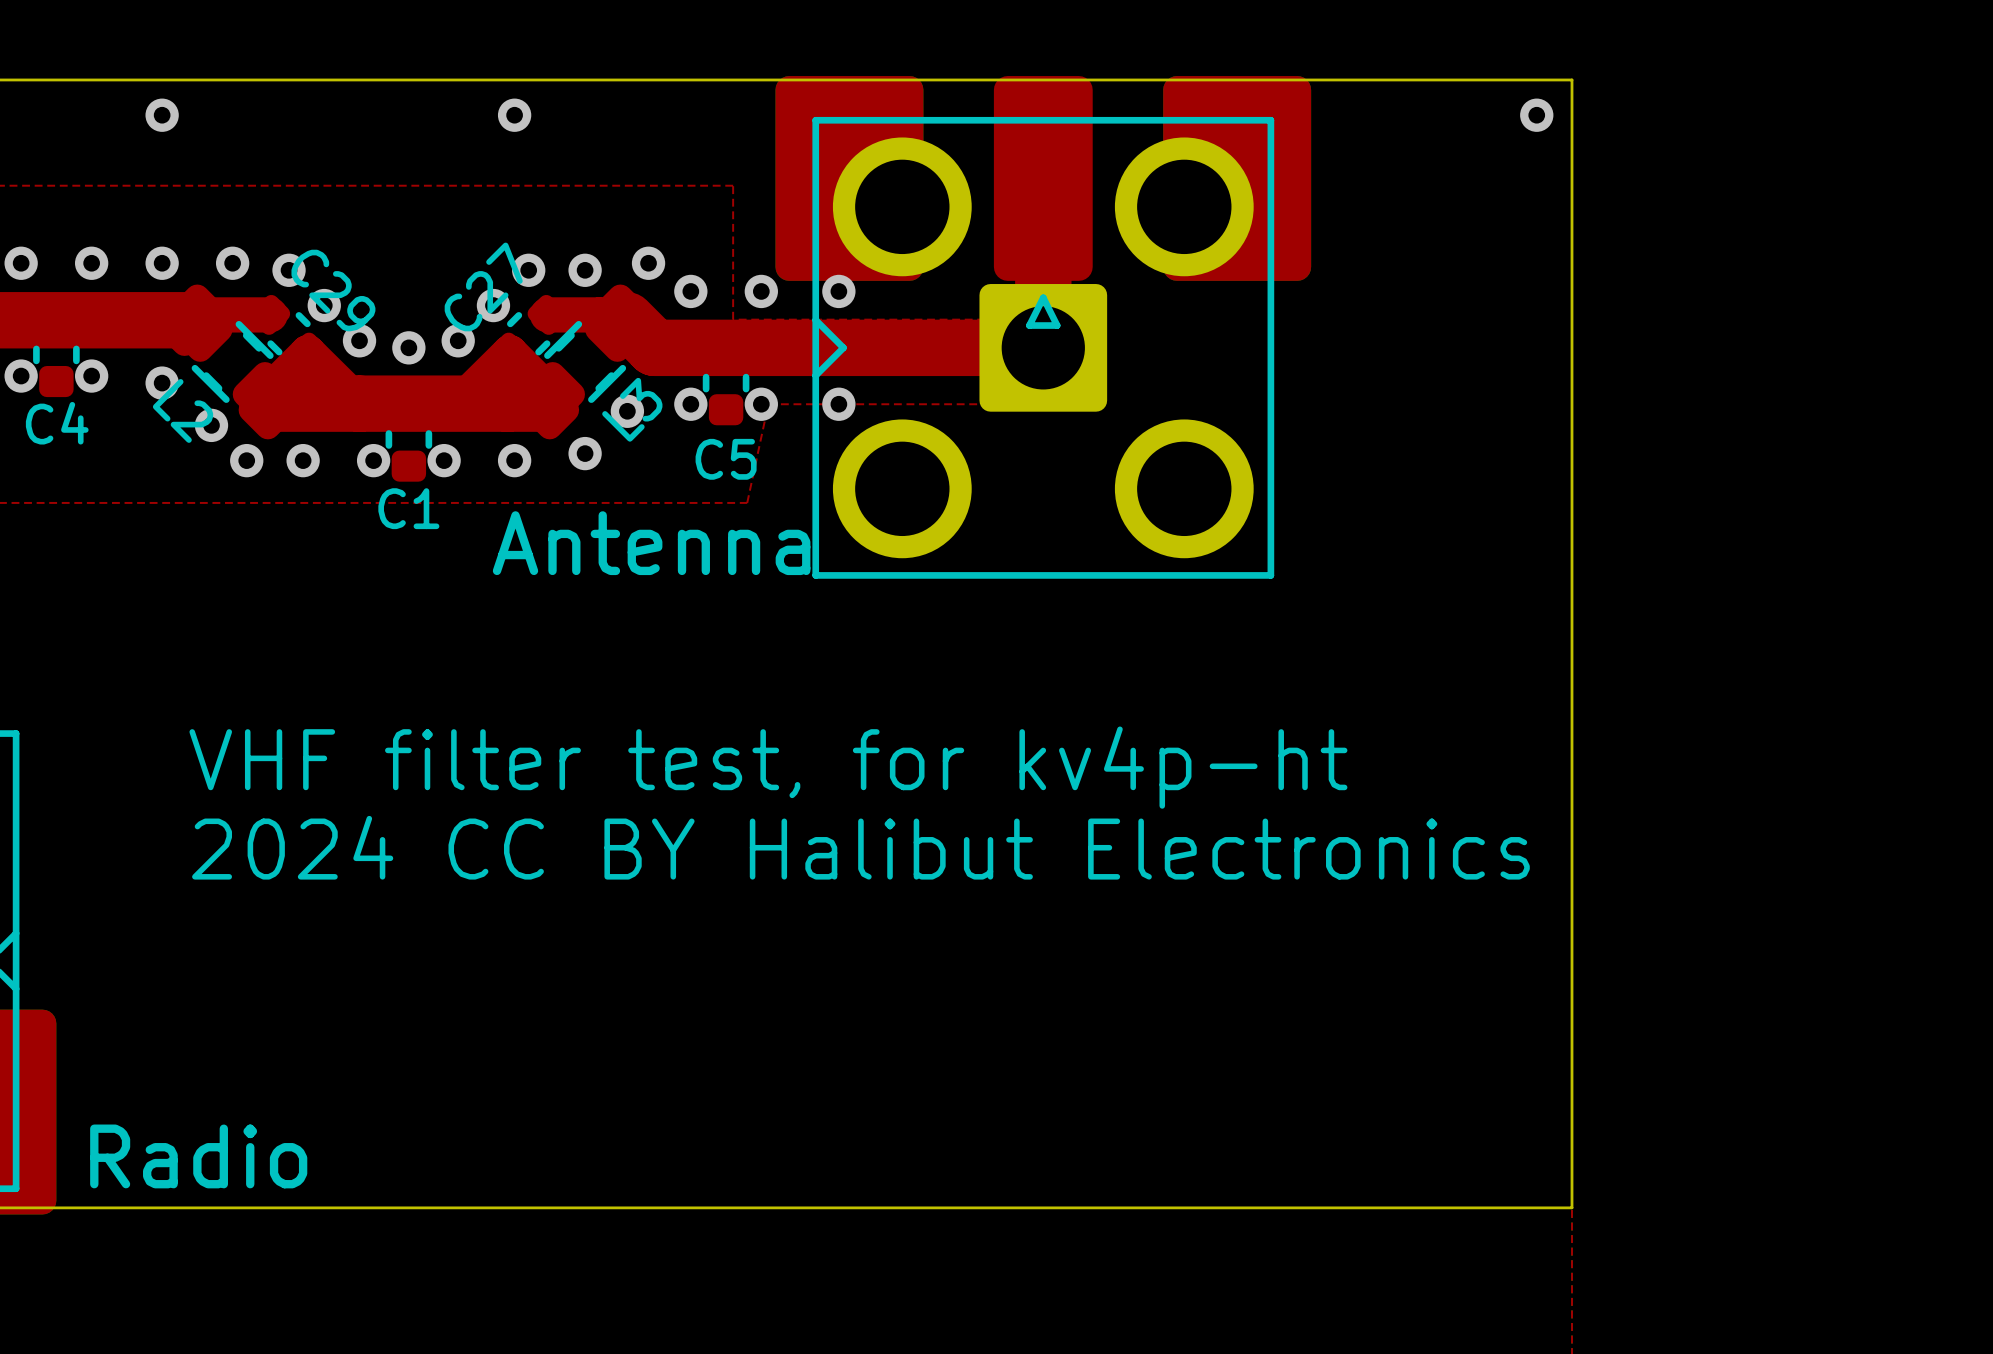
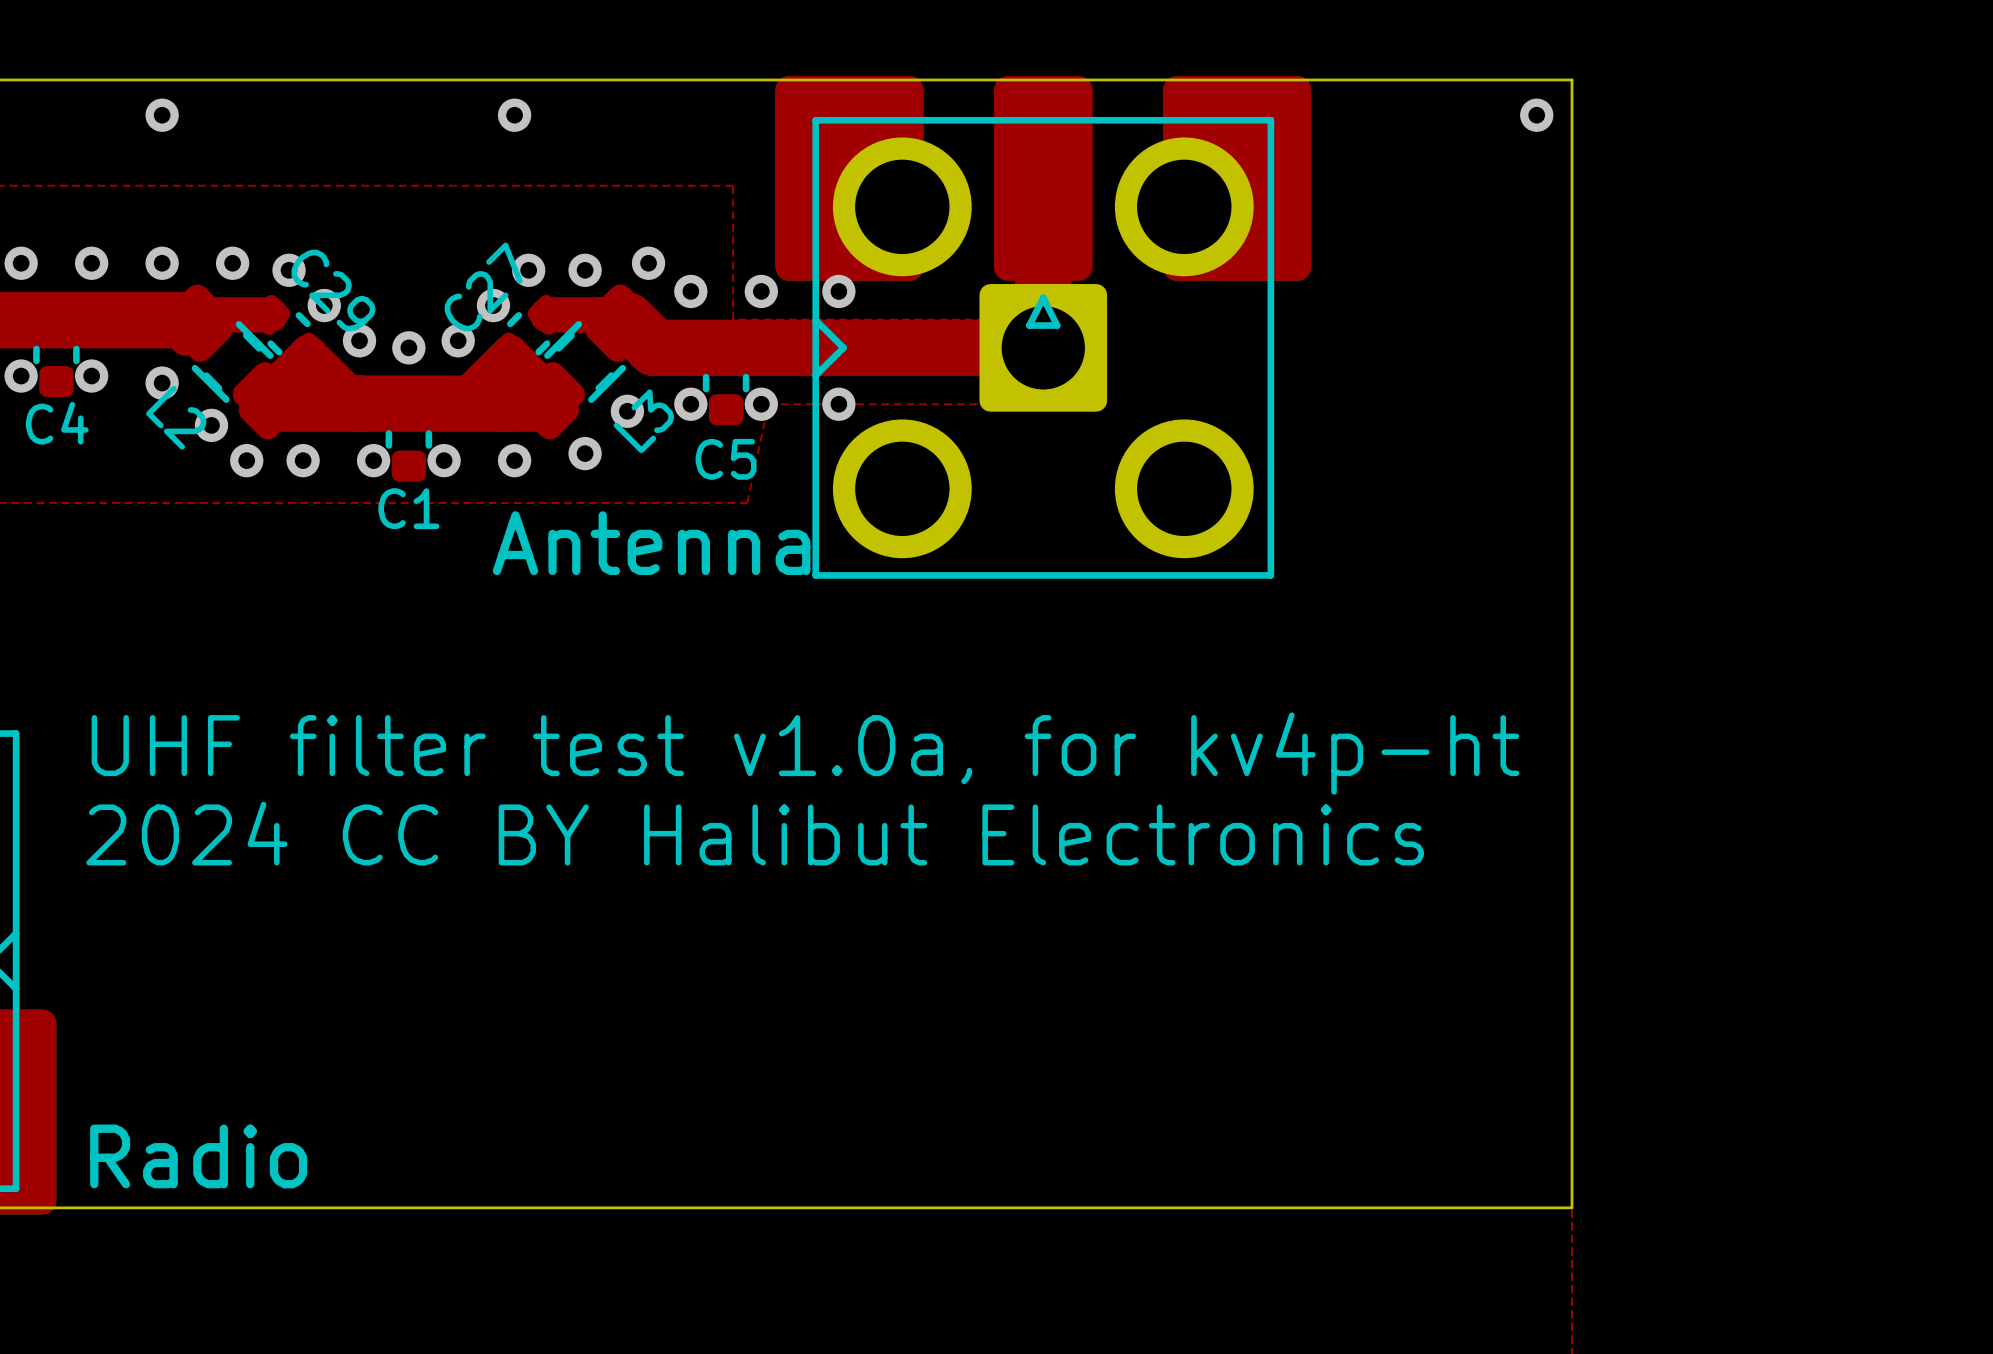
L3 name: L3 (632, 409) -> none
L2 name: L2 (183, 410) -> none
L2 name: none -> L2 (176, 417)
L3 name: none -> L3 (643, 421)
text: VHF filter test, for kv4p-ht (768, 767) -> UHF filter test v1.0a, for kv4p-ht (805, 753)
text position: 2024 CC BY Halibut Electronics (860, 847) -> 2024 CC BY Halibut Electronics (755, 833)

